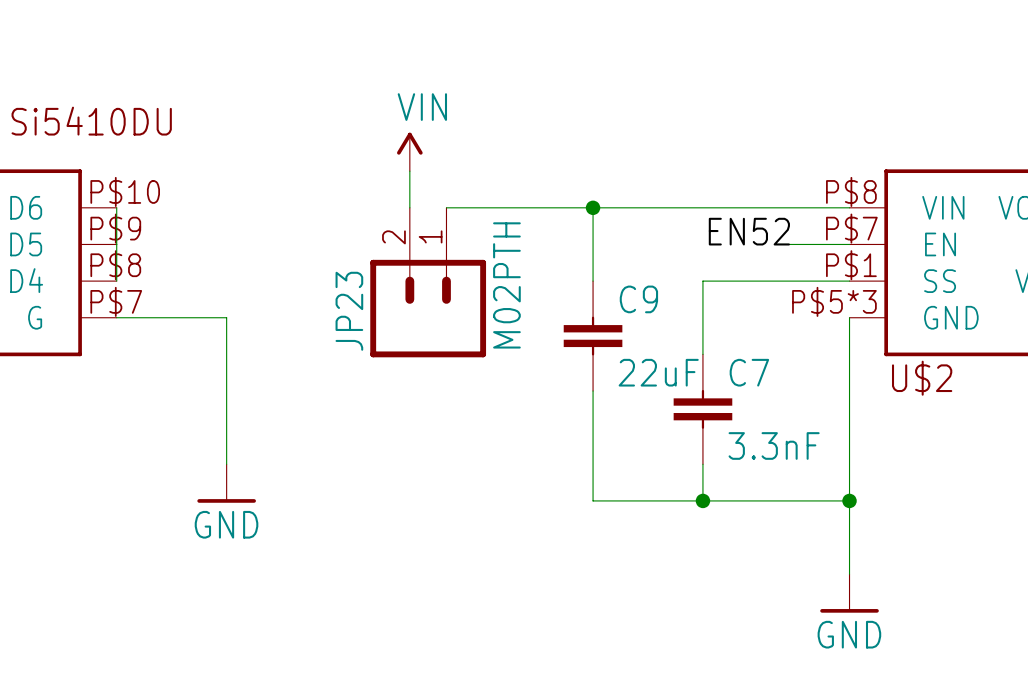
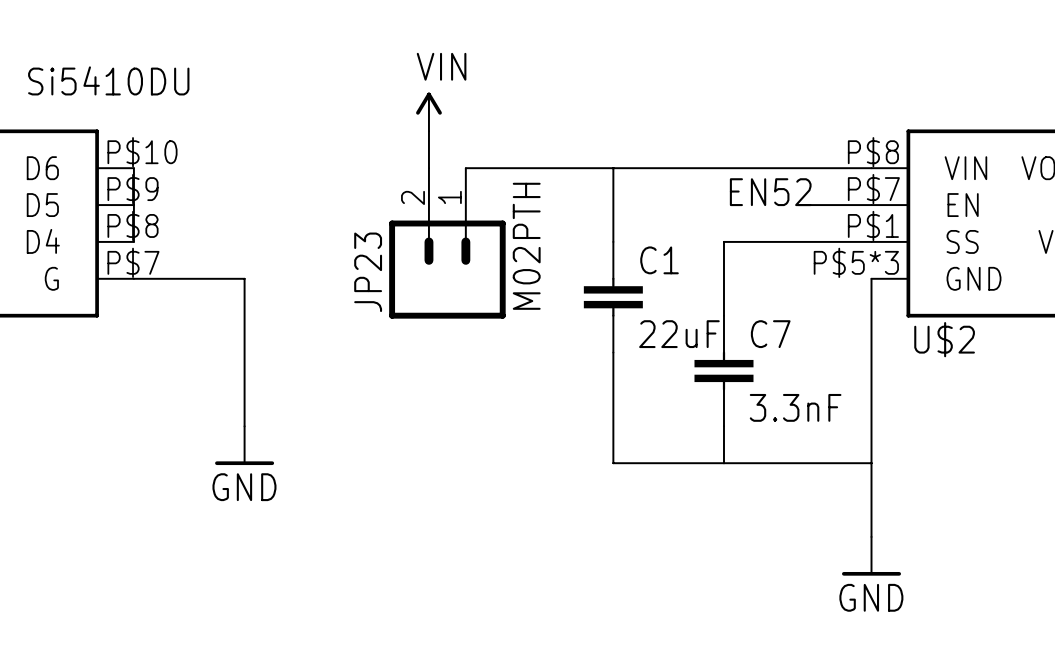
junction: (593, 207) -> none
C9 name: C9 (638, 299) -> C1 (659, 260)
junction: (702, 500) -> none
junction: (849, 500) -> none

